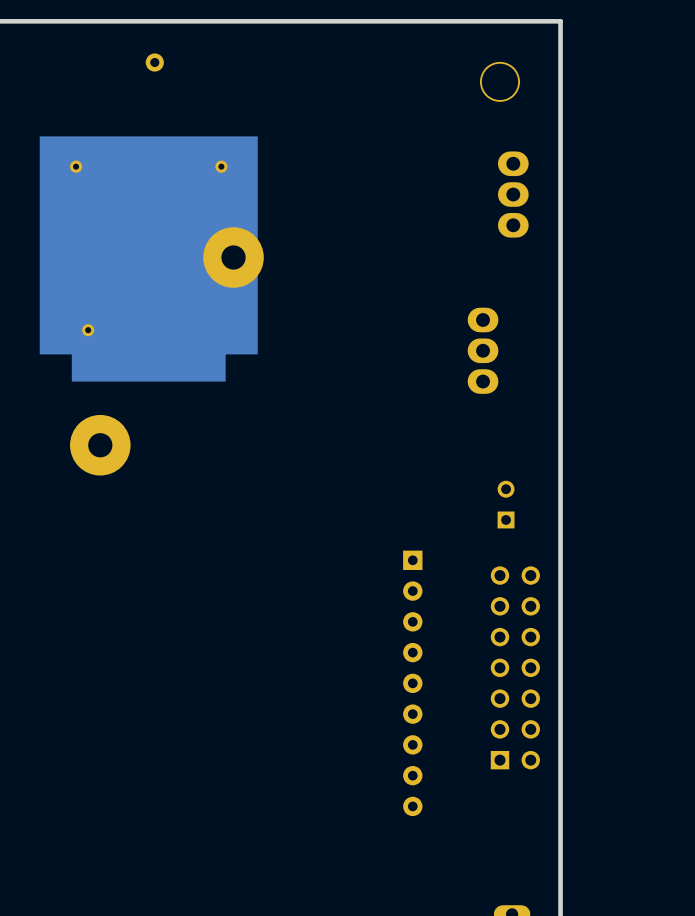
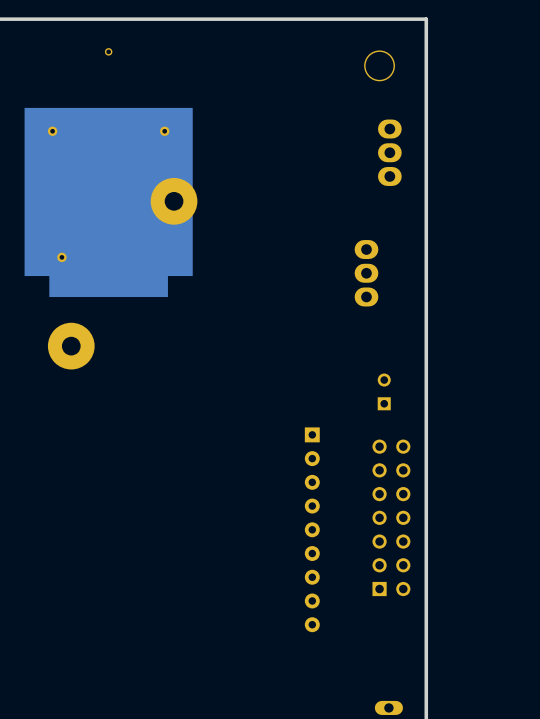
part footprint: [145, 53, 164, 72] -> [104, 48, 113, 56]

